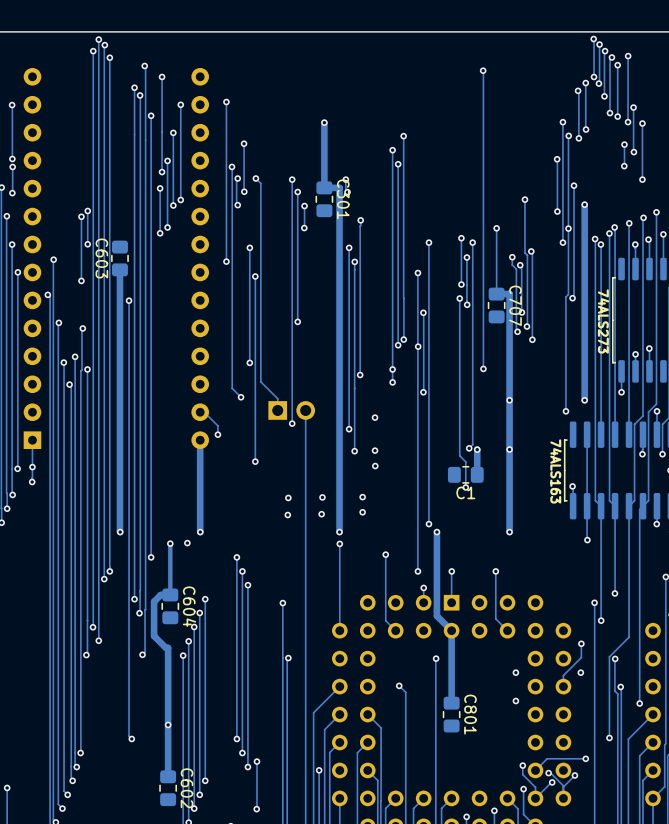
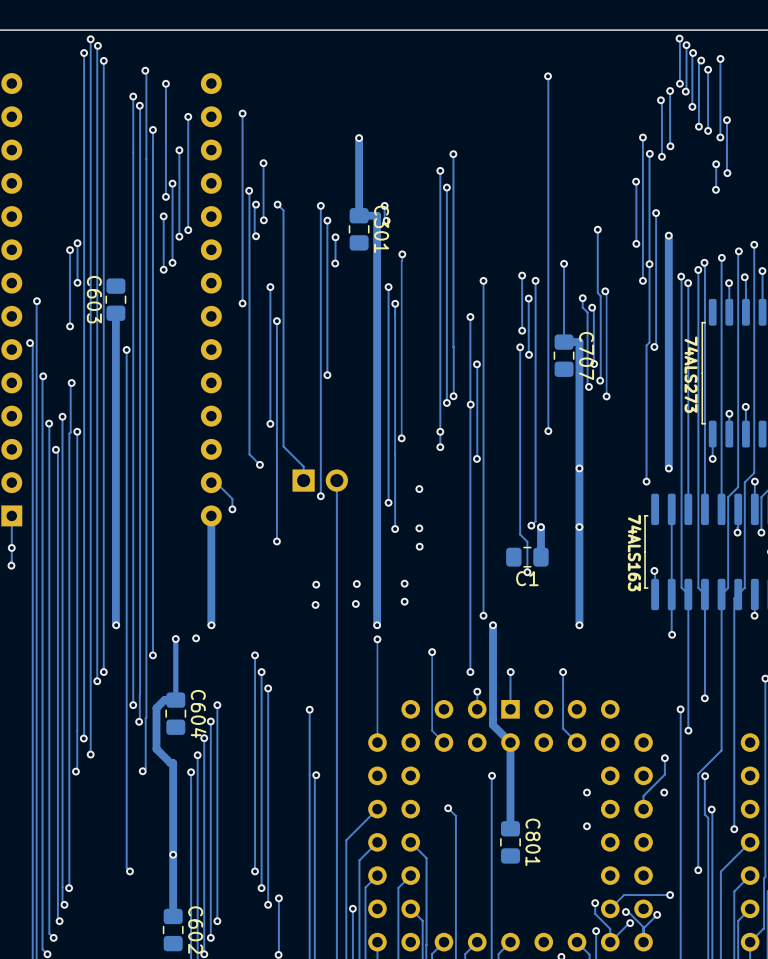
track: (642, 123) (642, 179) -> none
via: (642, 123) -> none
via: (642, 179) -> none

